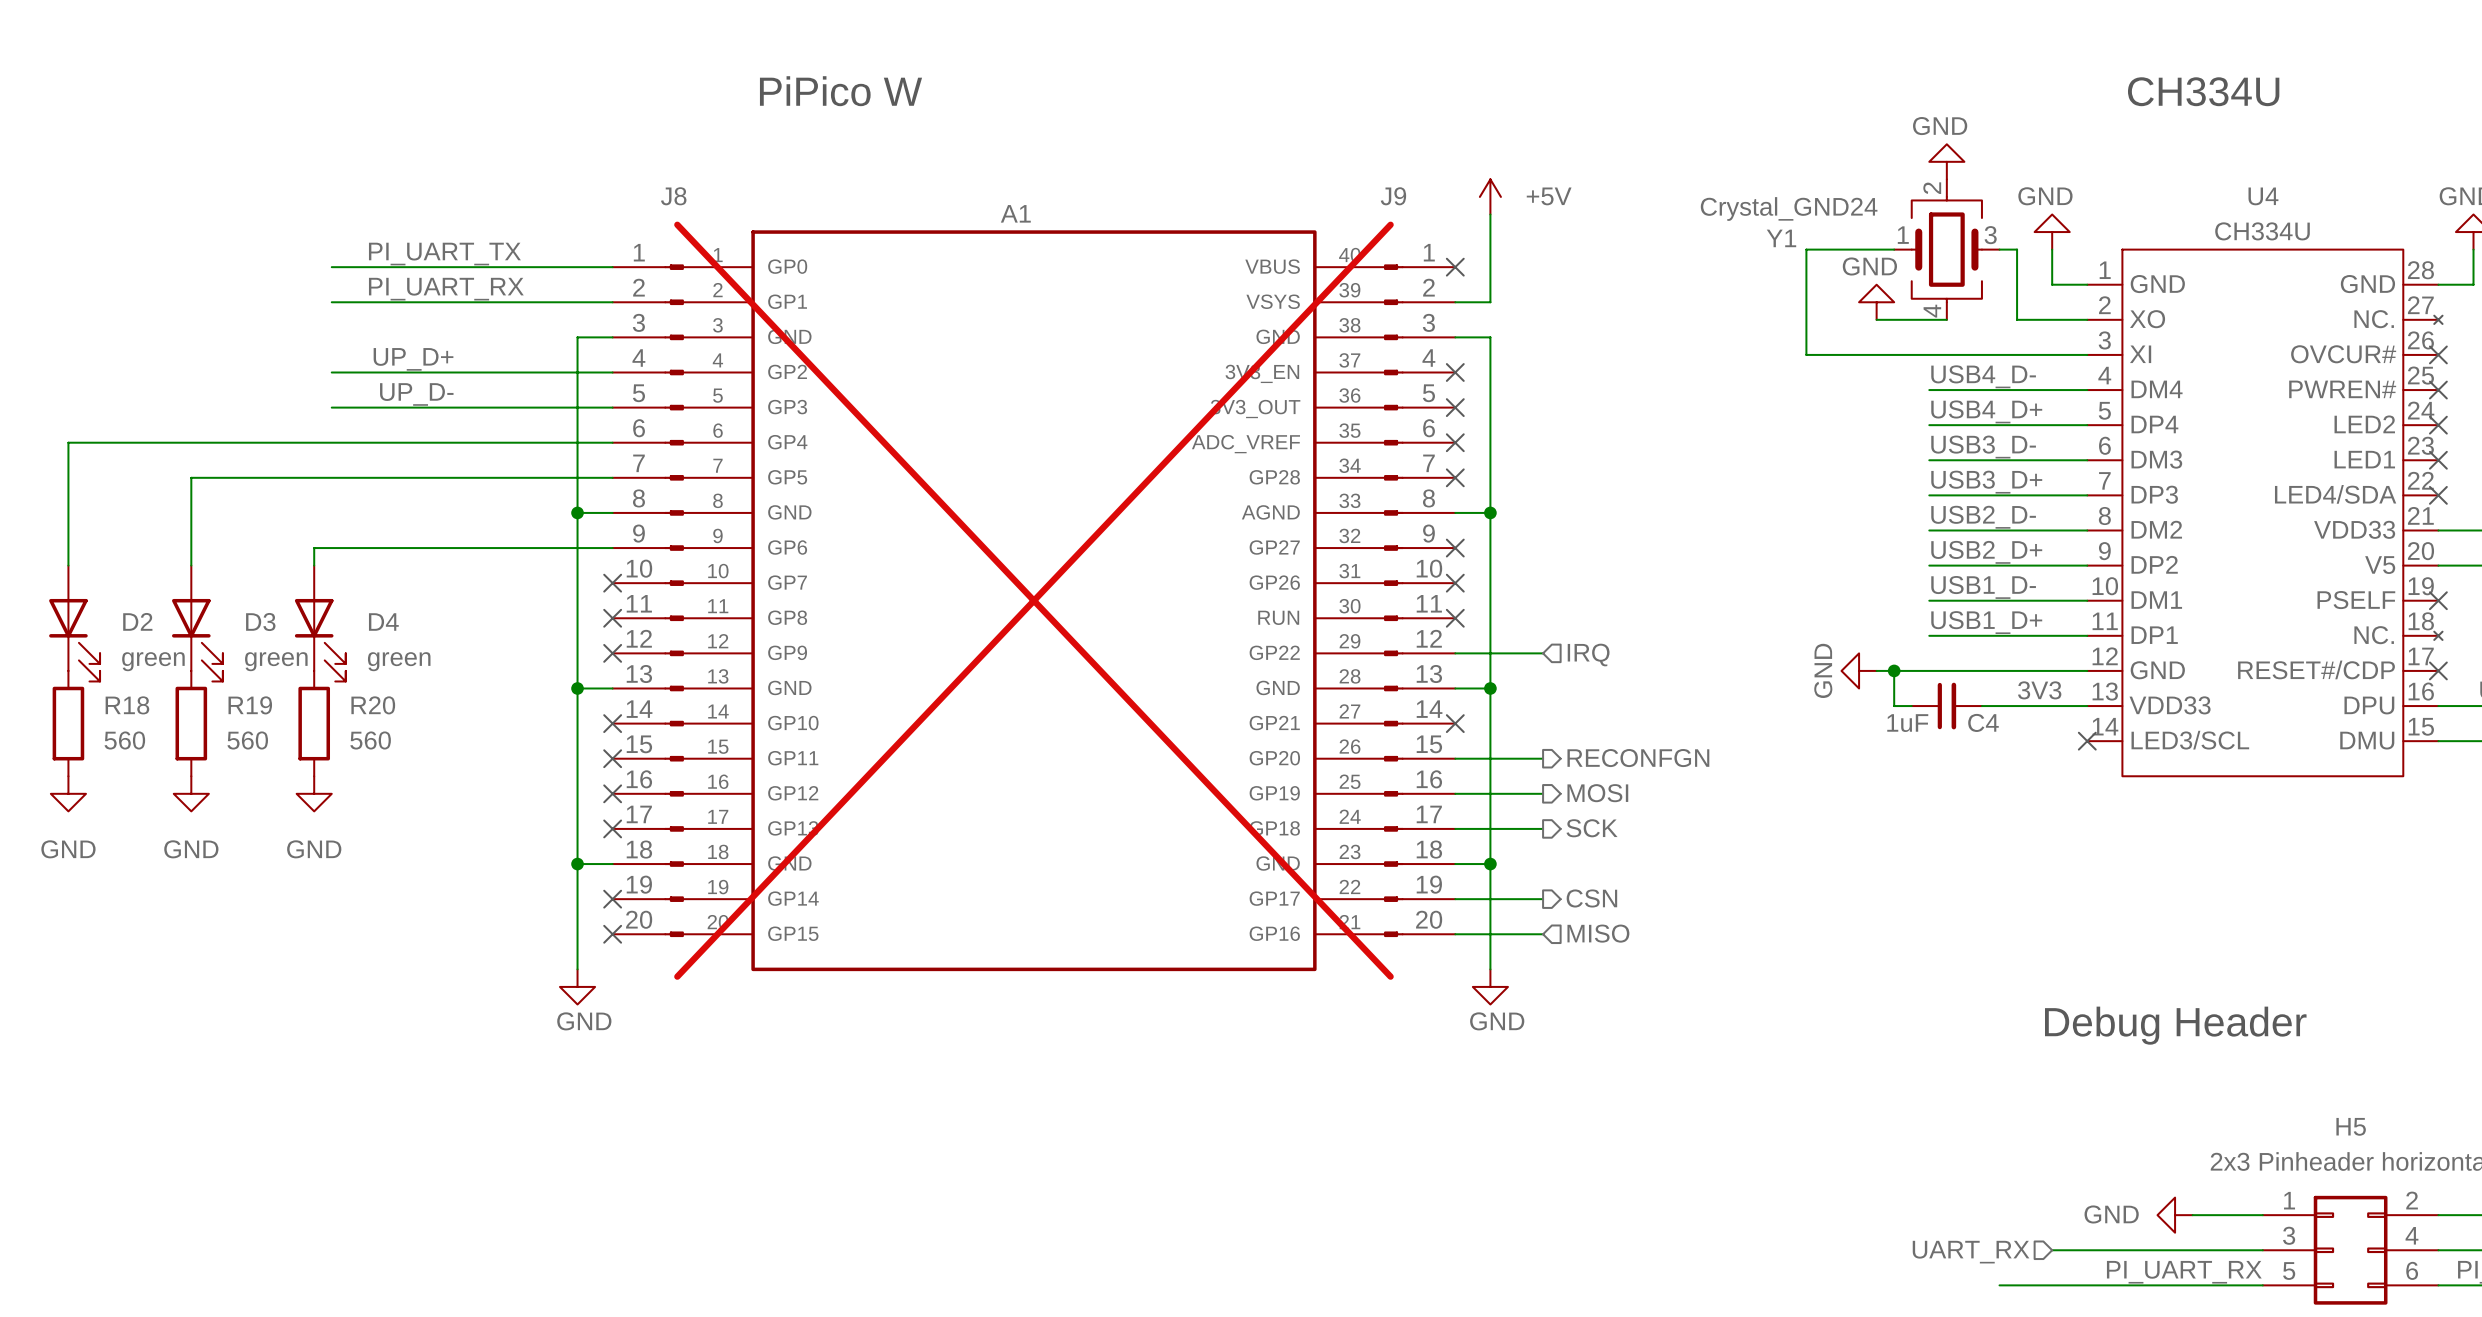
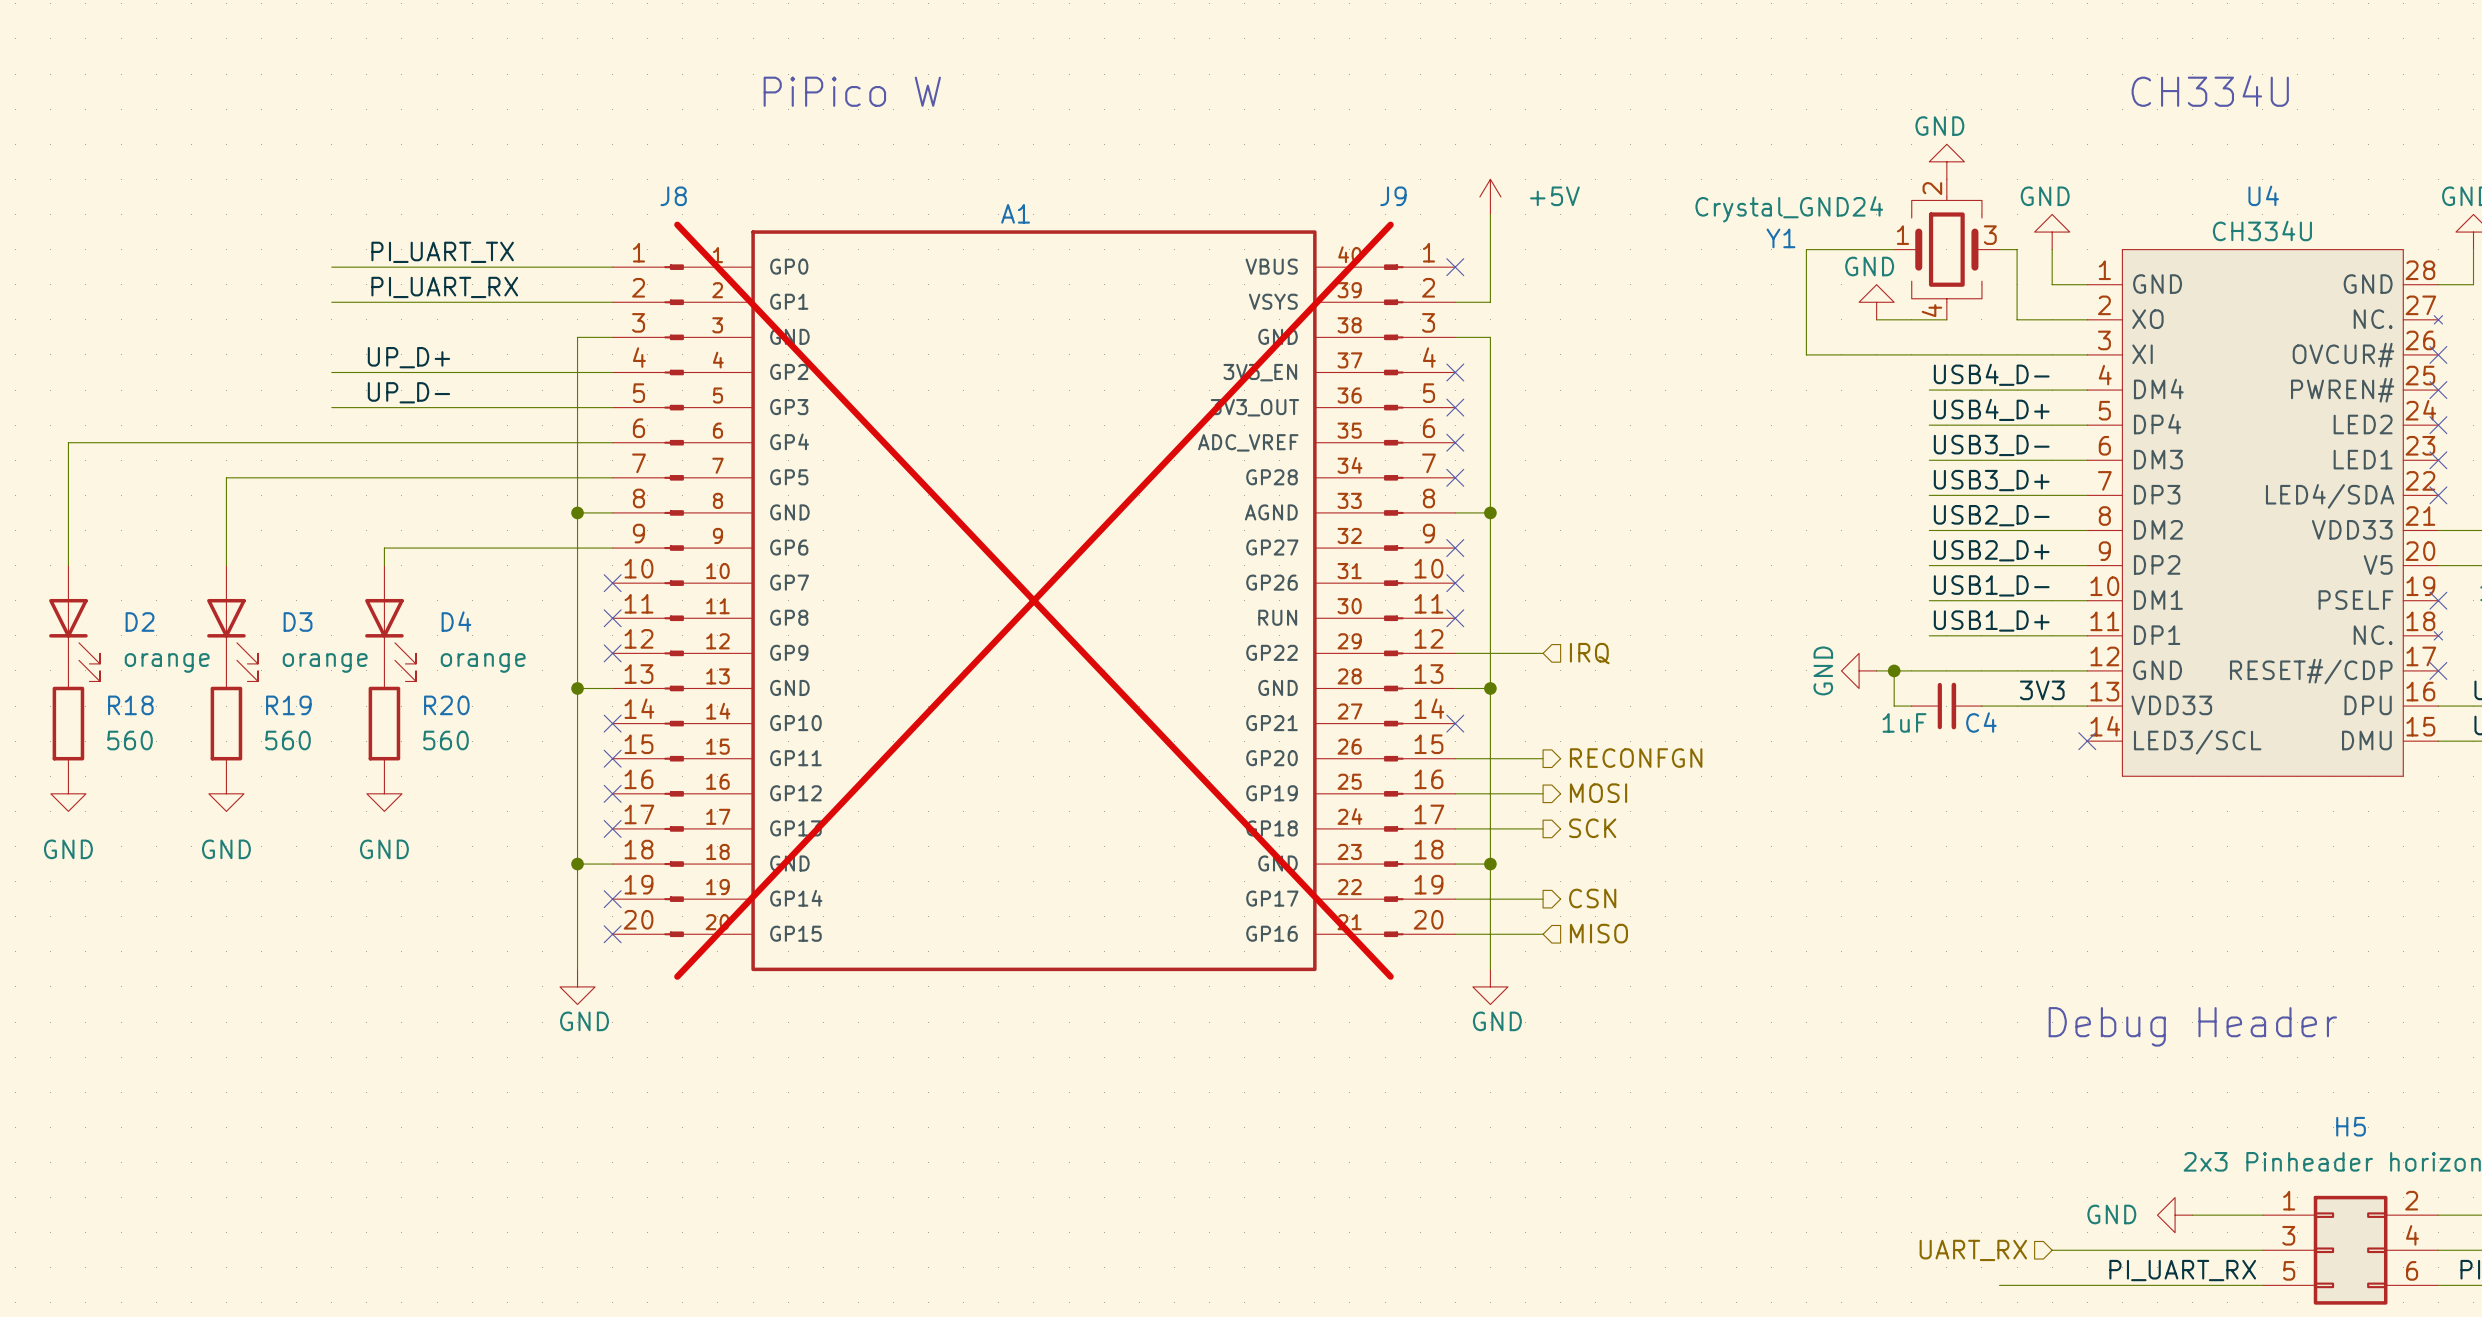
wire: (226, 477) (191, 477) (191, 565) -> (226, 477) (226, 565)
wire: (384, 548) (314, 548) (314, 565) -> (384, 548) (384, 565)
D3 position: (197, 623) -> (232, 623)
D4 position: (320, 623) -> (390, 623)
D2 value: green (153, 661) -> orange (167, 662)
D3 value: green (276, 661) -> orange (325, 662)
D4 value: green (399, 661) -> orange (483, 662)
R19 position: (191, 723) -> (226, 723)
R20 position: (314, 723) -> (384, 723)
power symbol position: GND (191, 793) -> GND (226, 793)
power symbol: GND (314, 793) -> none
power symbol: none -> GND (384, 793)

